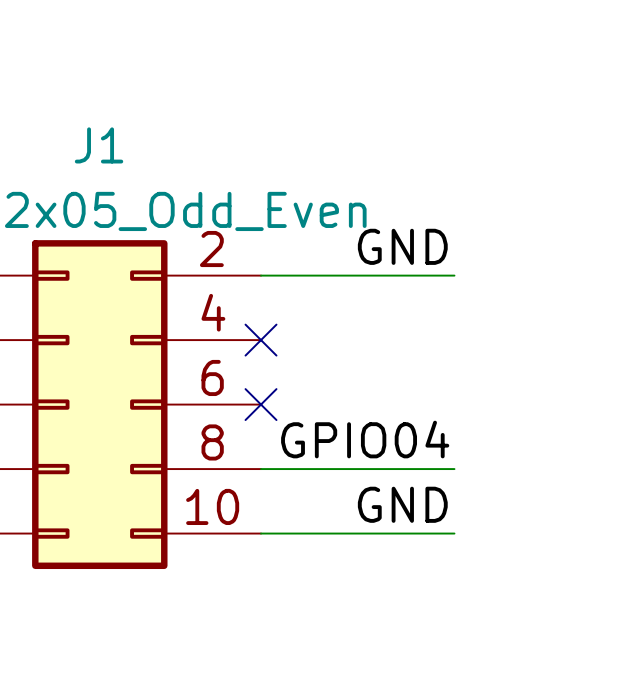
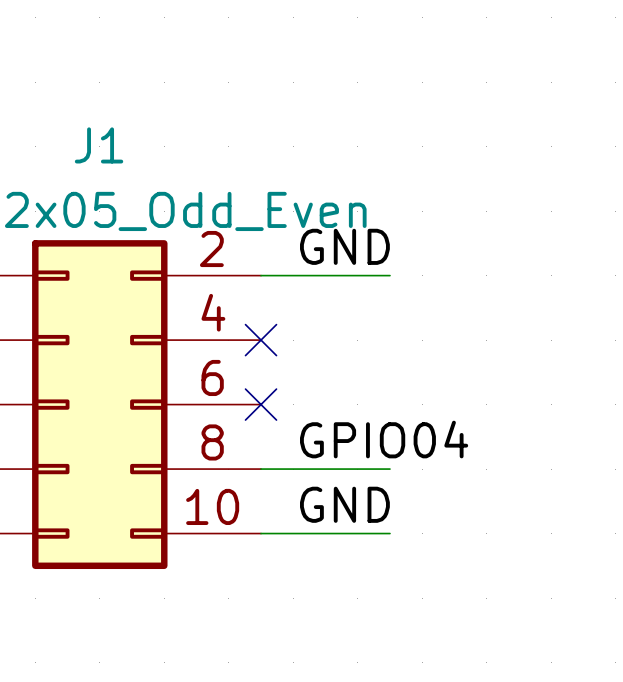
label position: GND (402, 246) -> GND (344, 246)
wire: (389, 275) (454, 275) -> none
label position: GPIO04 (365, 439) -> GPIO04 (384, 439)
wire: (389, 469) (454, 469) -> none
label position: GND (402, 504) -> GND (344, 504)
wire: (389, 533) (454, 533) -> none

